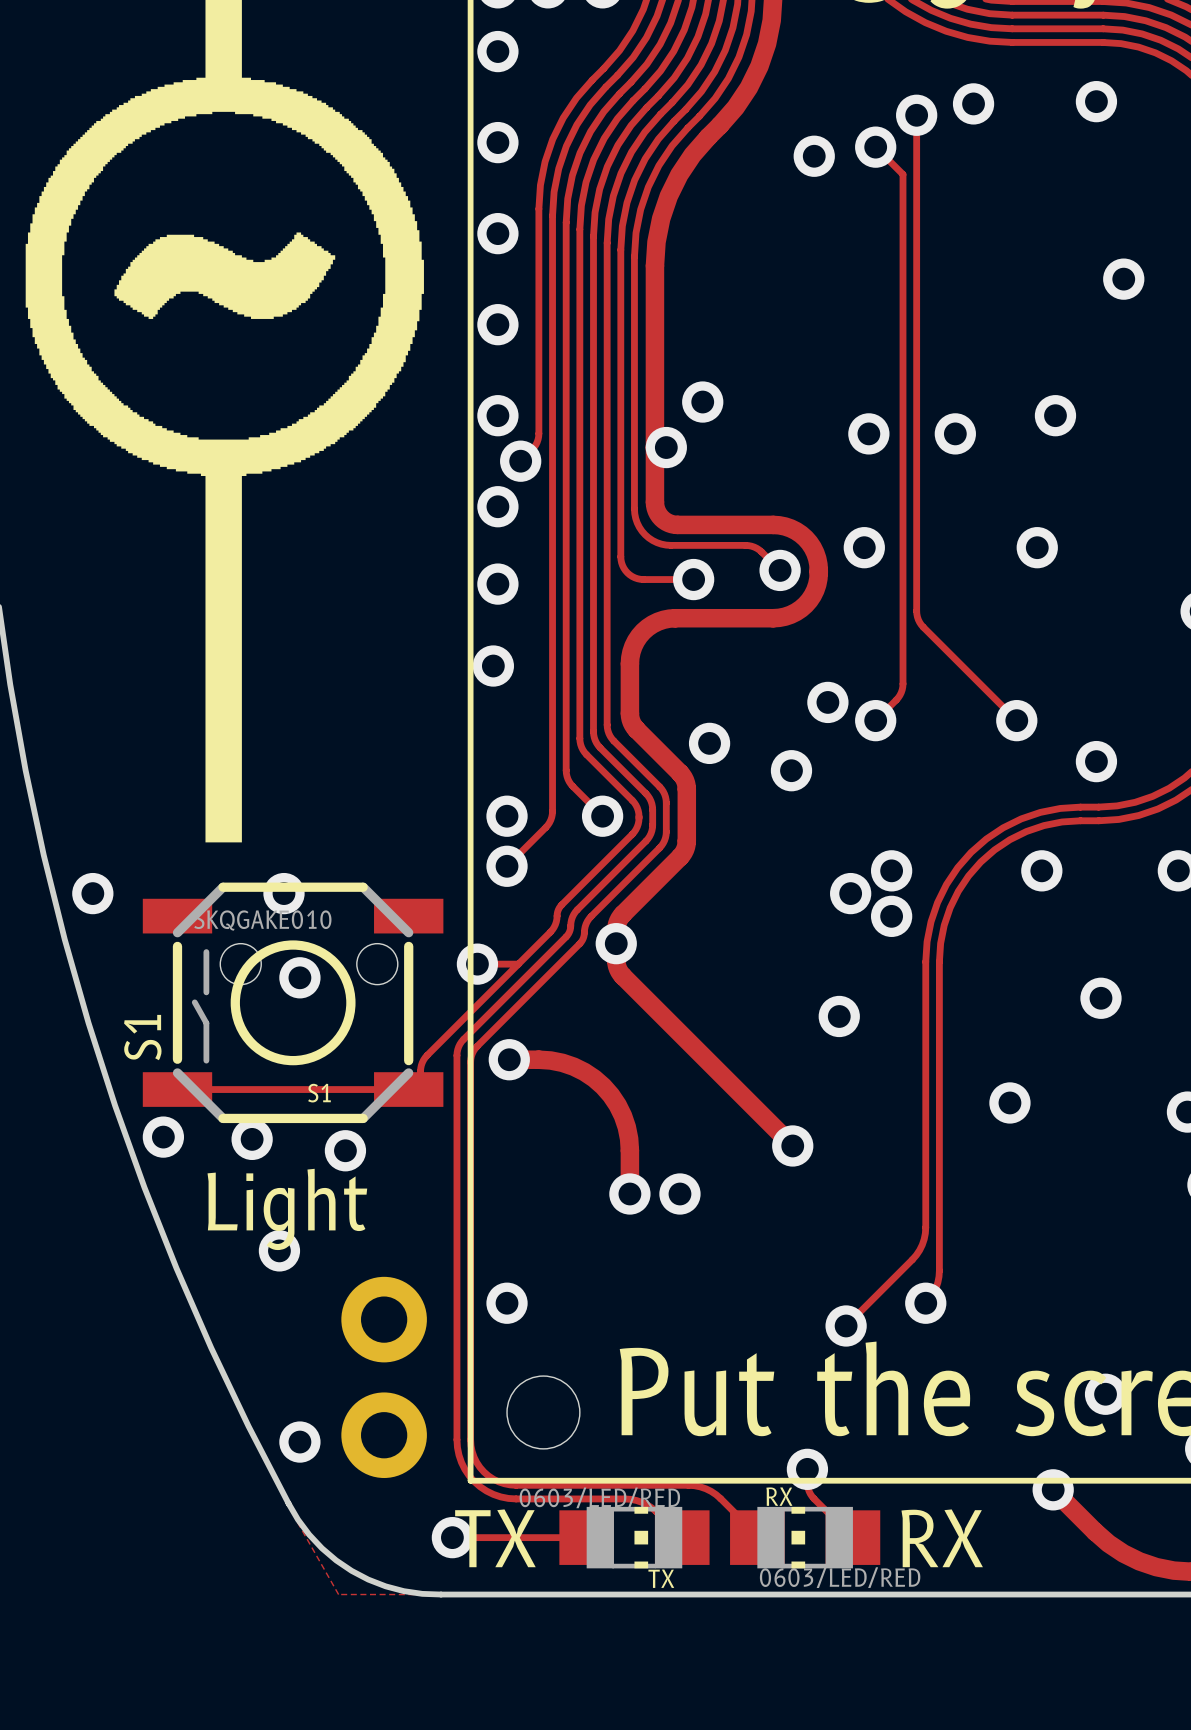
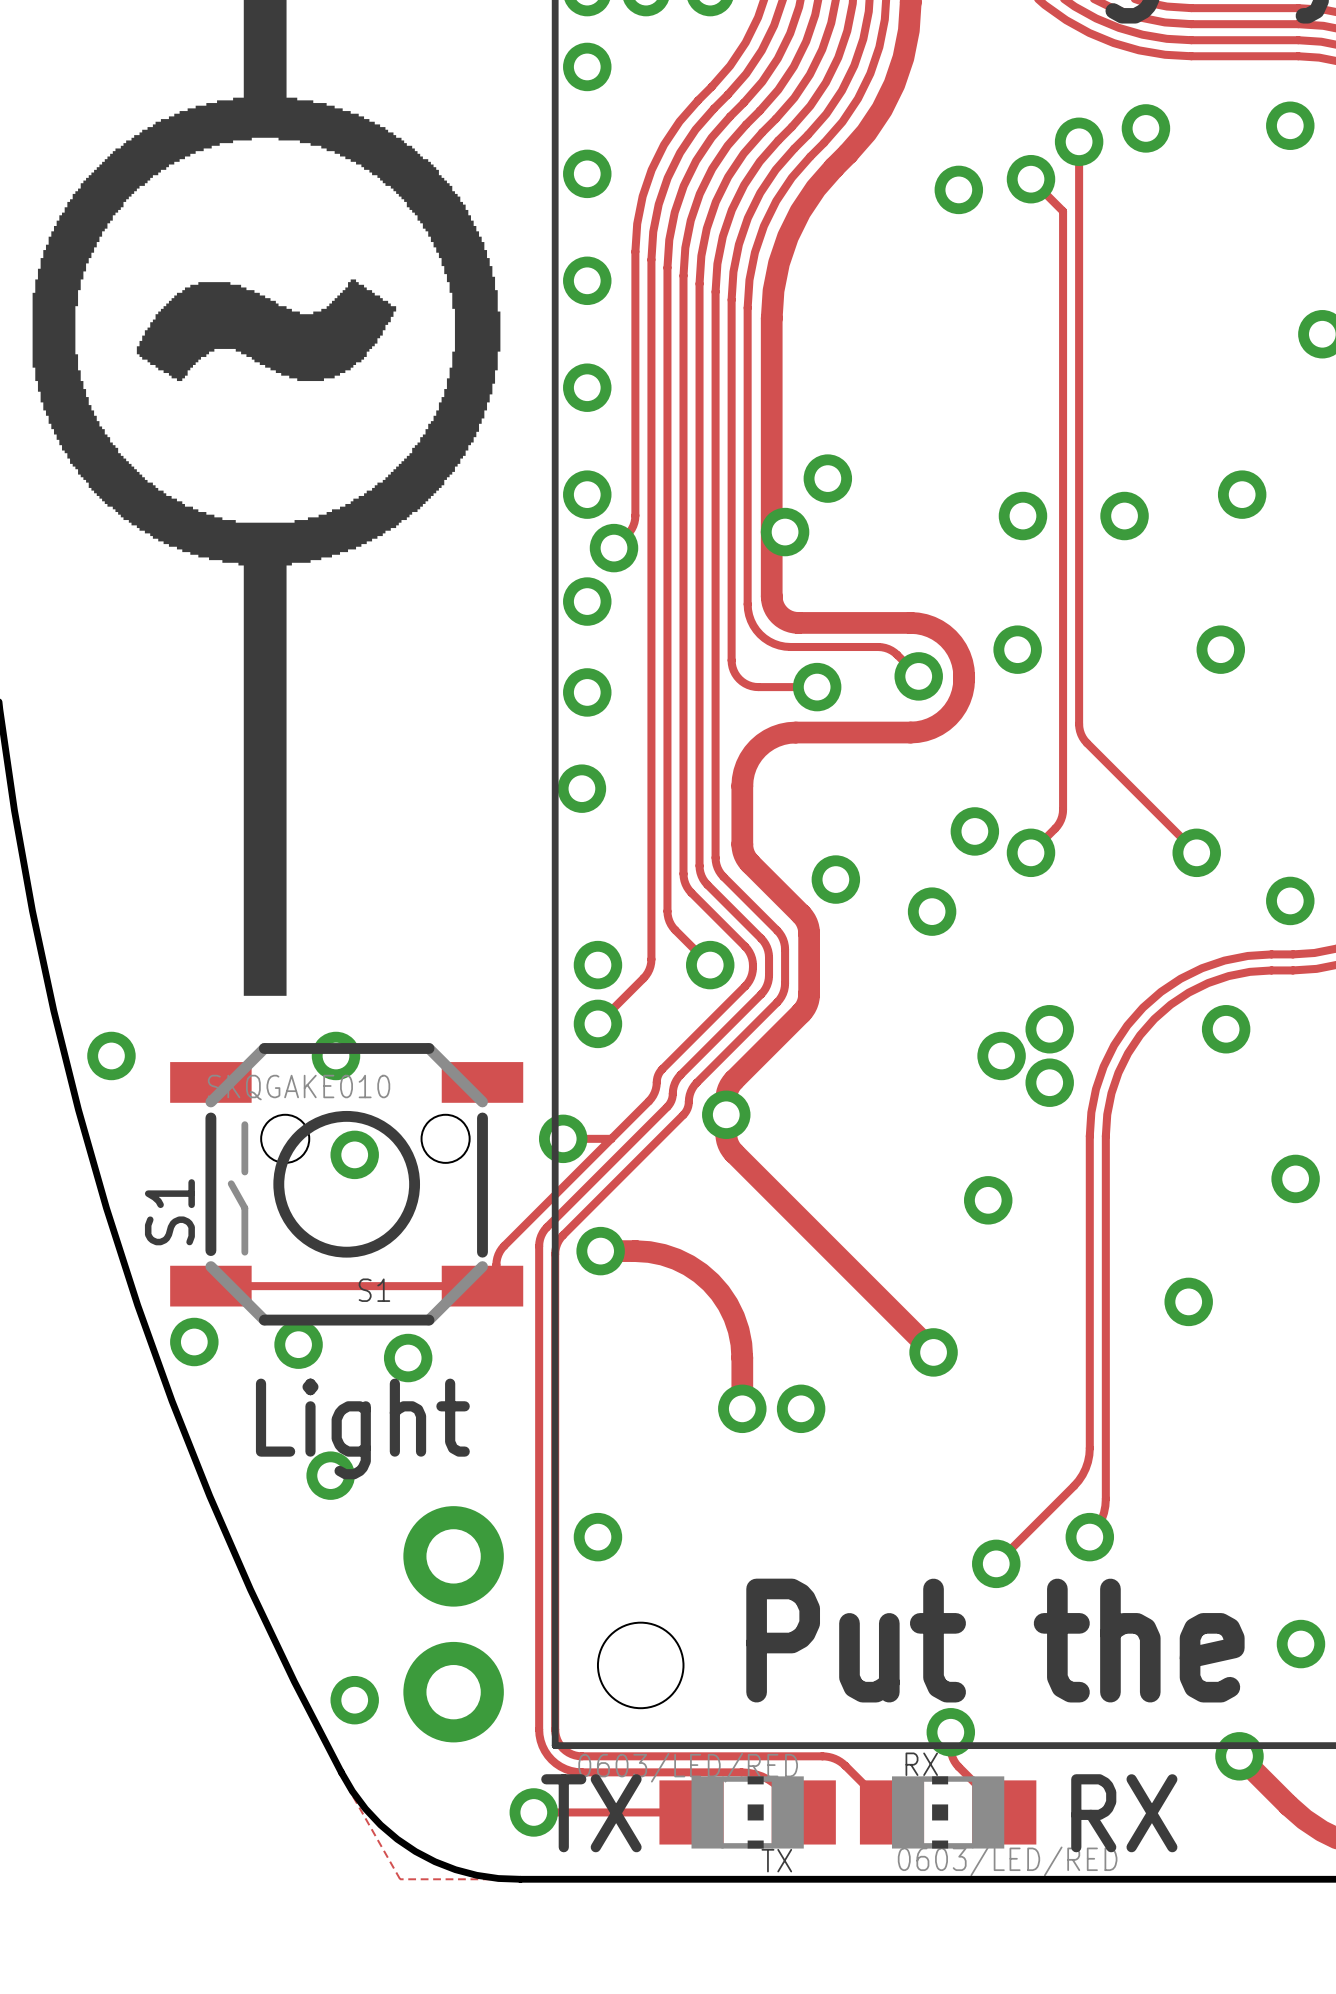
track: (456, 1439) (461, 1462) (469, 1475) (480, 1486) (493, 1494) (516, 1498) (630, 1499) (647, 1505) (661, 1516) -> (539, 1697) (539, 1735) (542, 1745) (551, 1759) (565, 1769) (581, 1772) (748, 1772) (762, 1776) (779, 1788)
track: (470, 1439) (472, 1451) (476, 1462) (488, 1475) (498, 1481) (516, 1485) (700, 1486) (711, 1491) (720, 1498) (757, 1535) (757, 1537) -> (555, 1697) (556, 1736) (560, 1745) (571, 1754) (581, 1756) (828, 1756) (843, 1763) (891, 1812)

